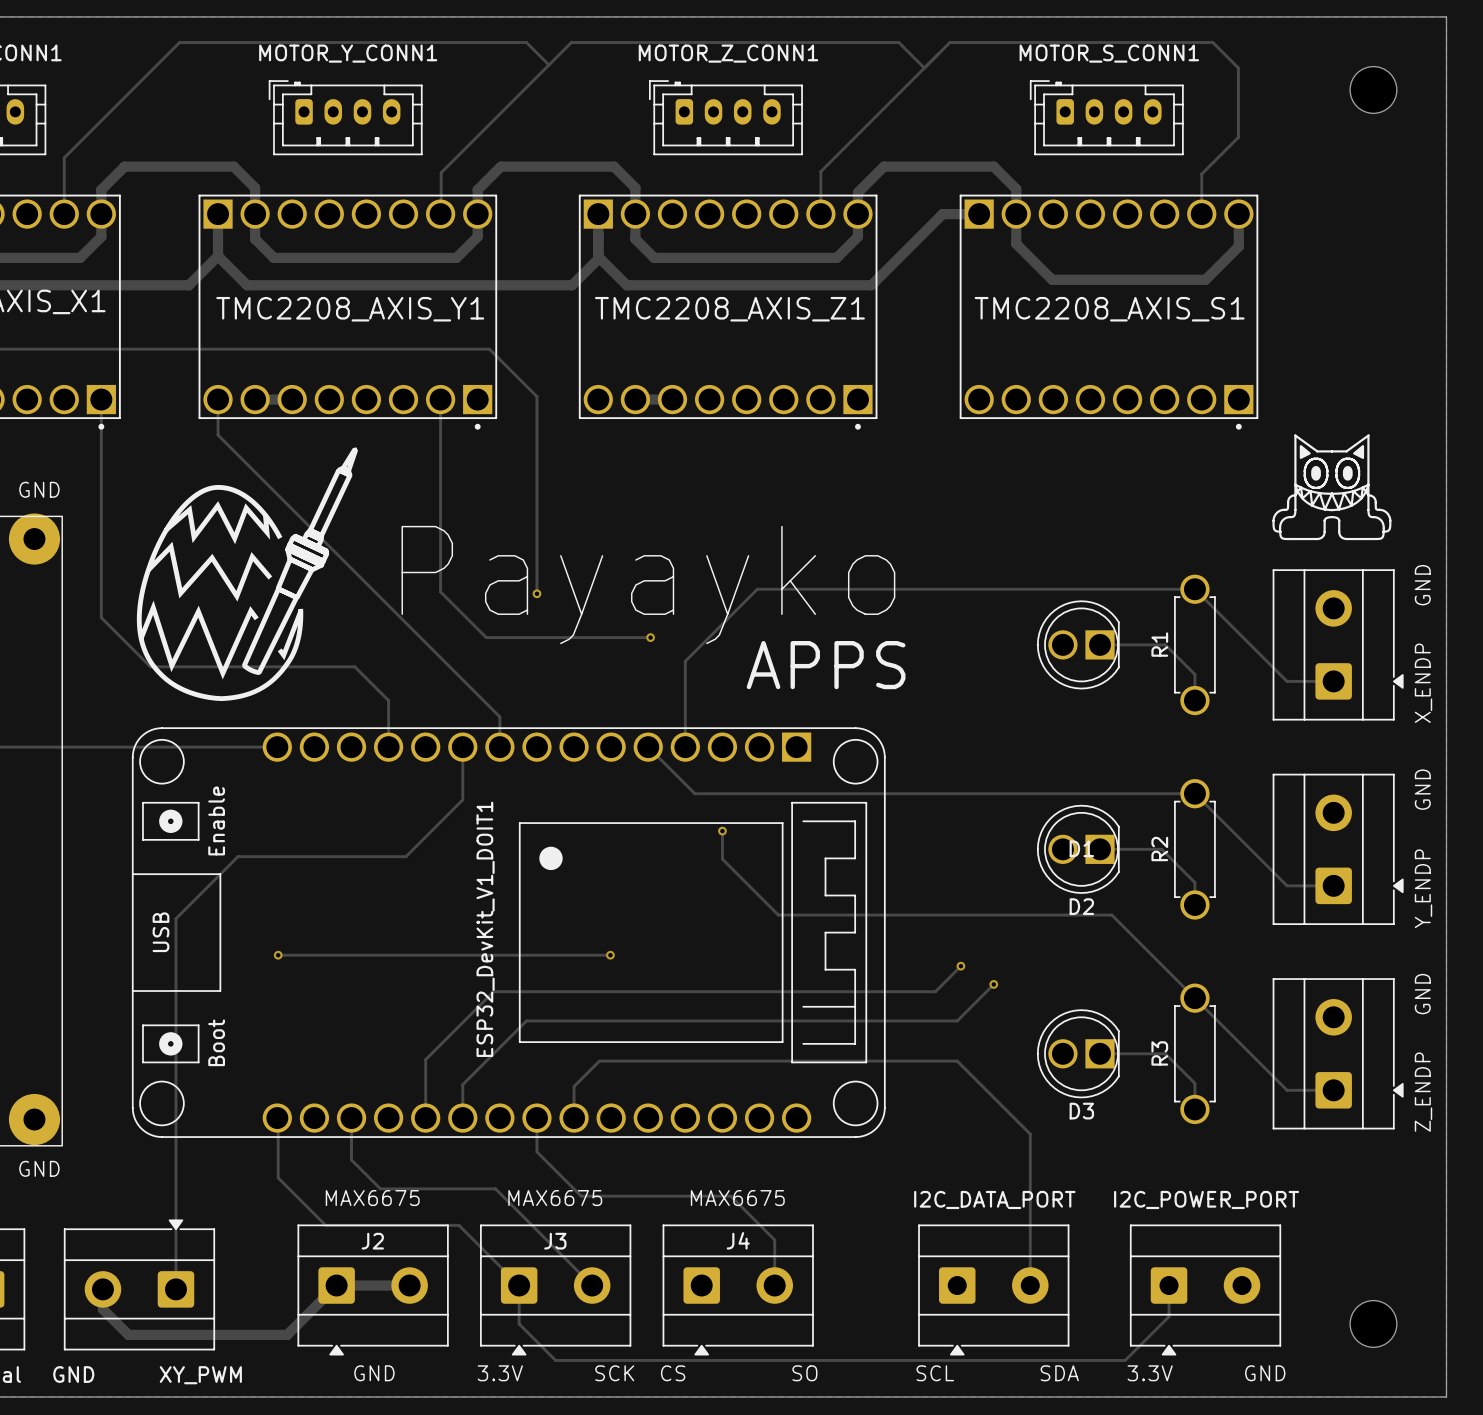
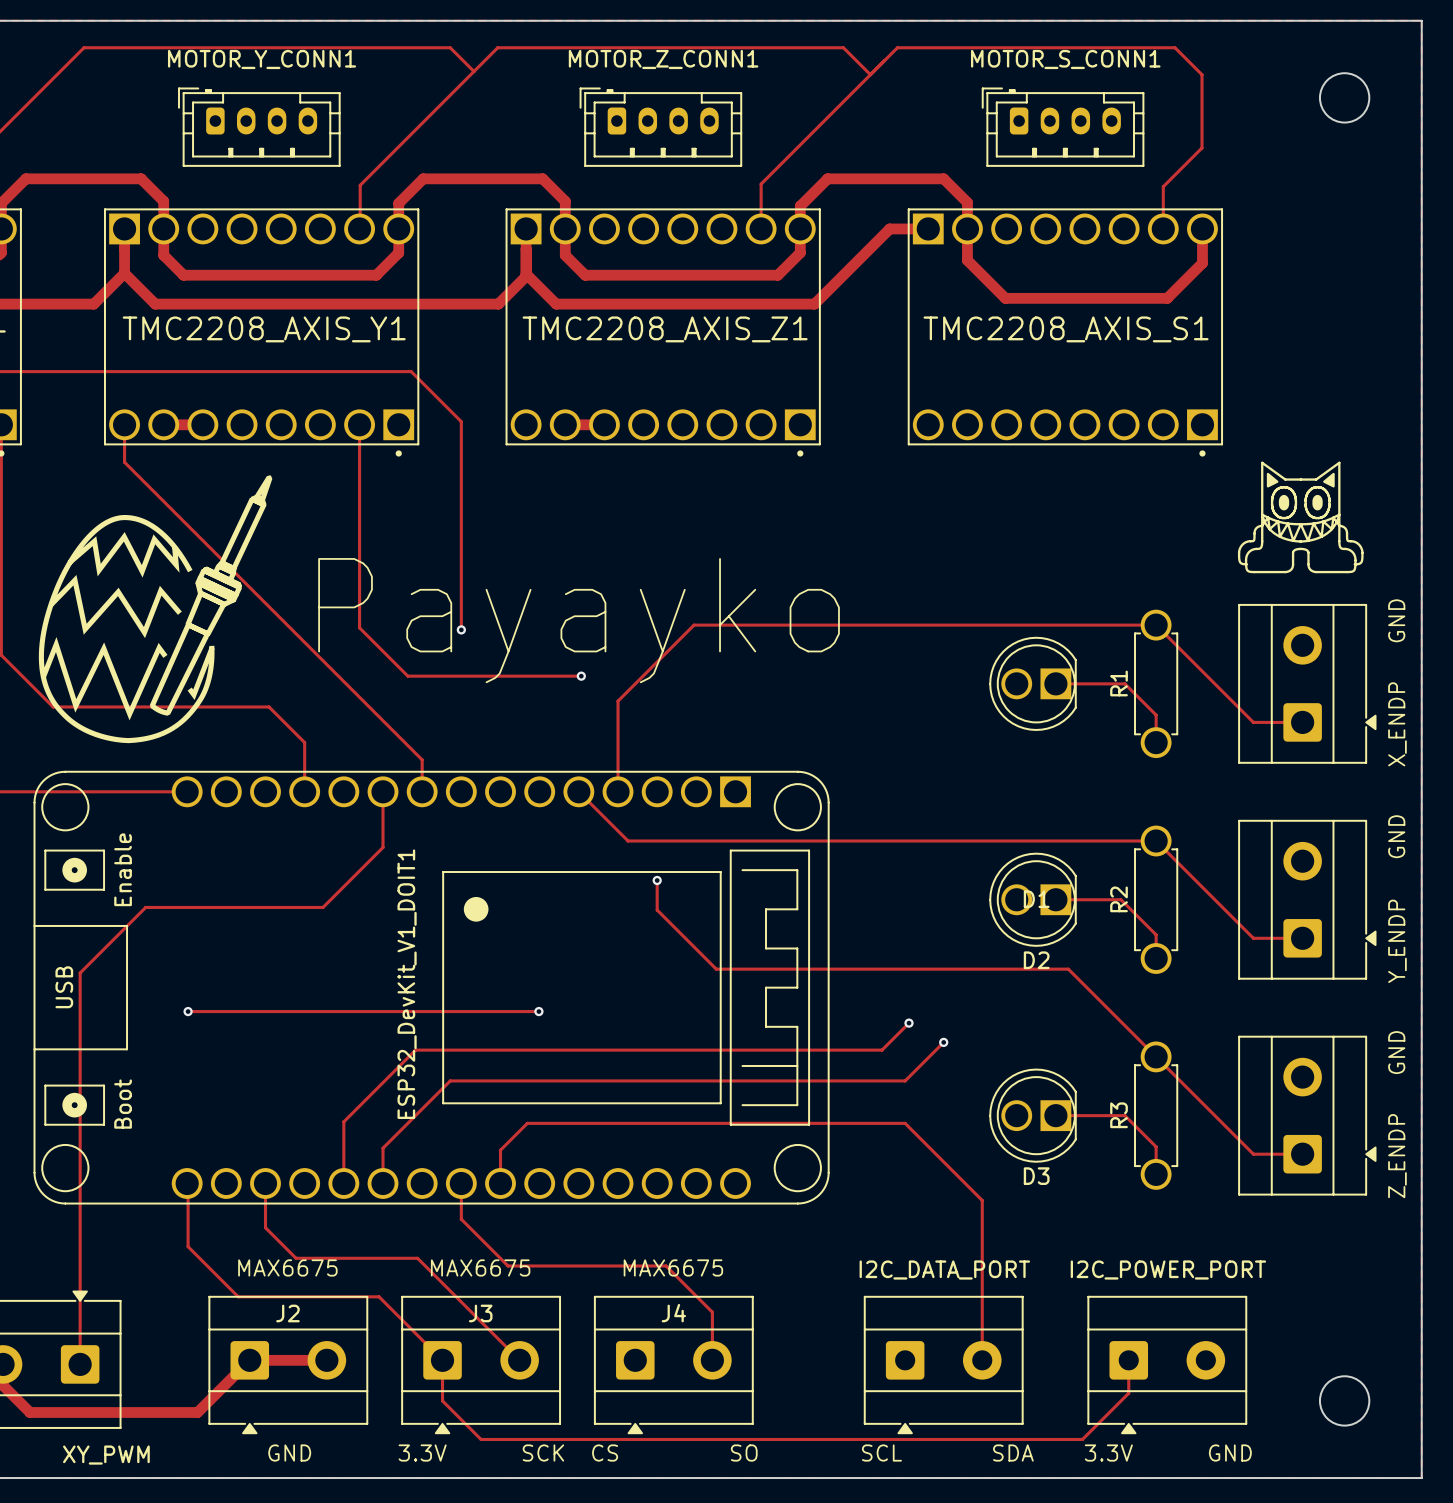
text: APPS (826, 665) -> none

